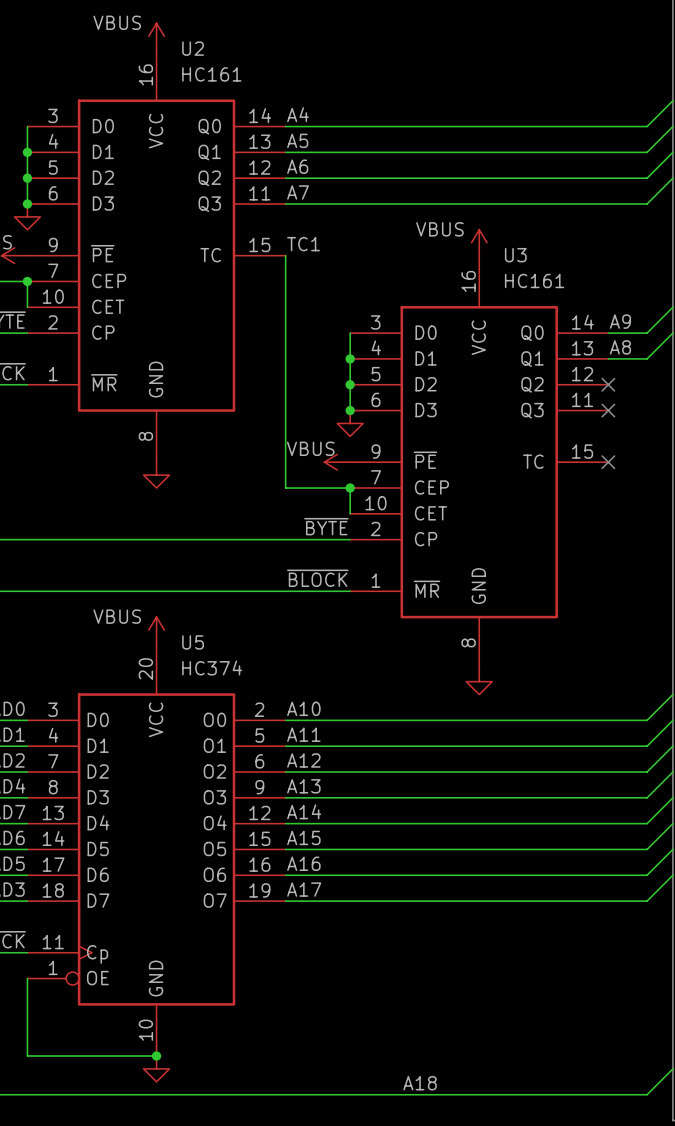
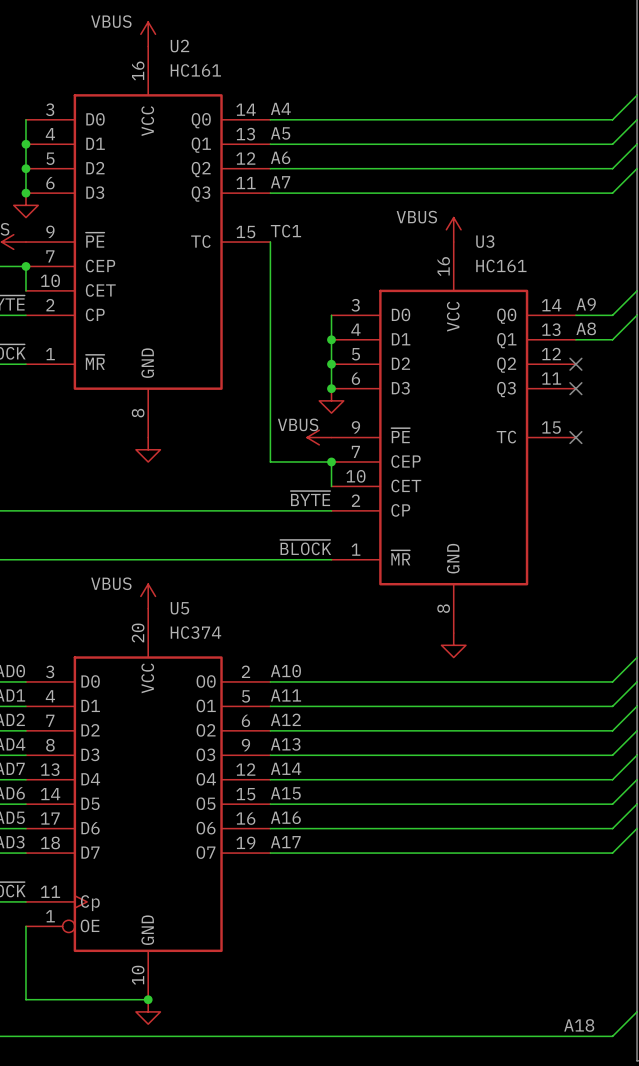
label position: A18 (420, 1083) -> A18 (579, 1025)

